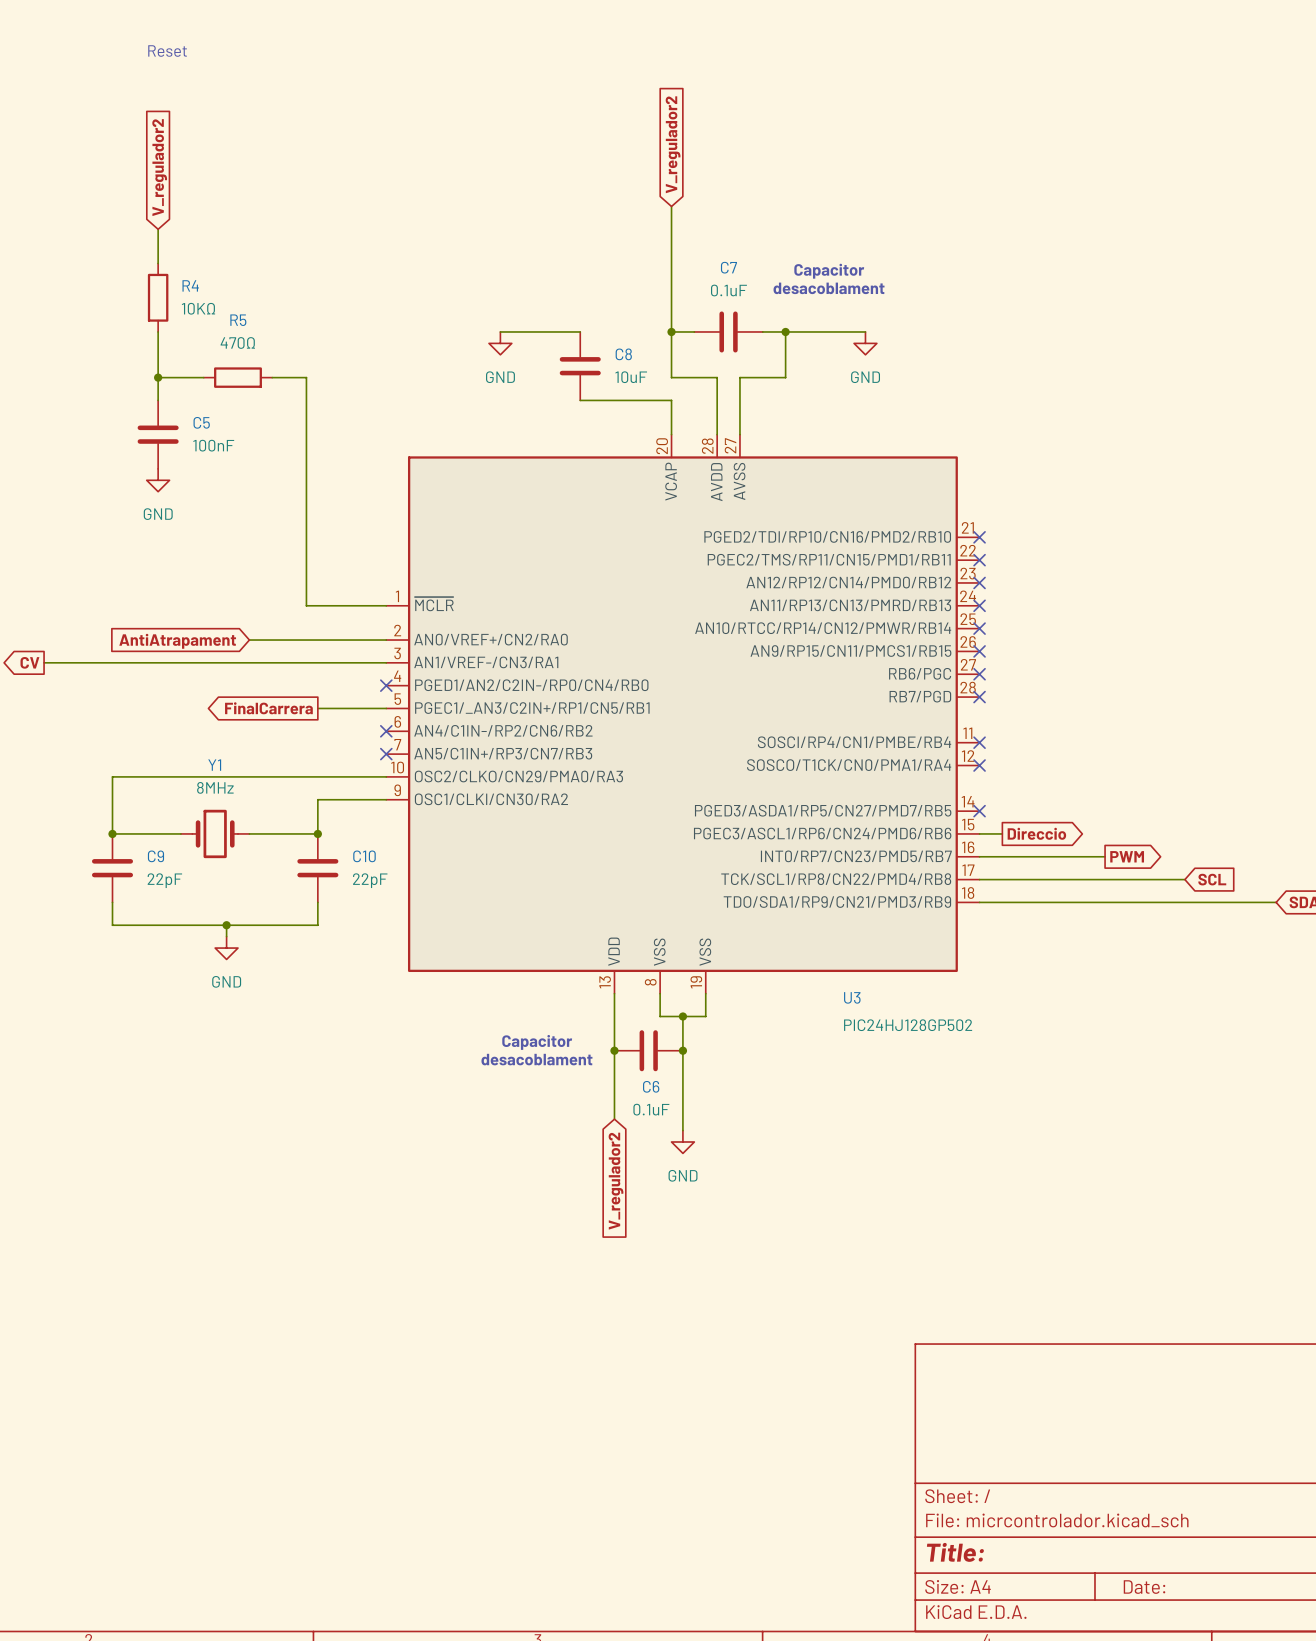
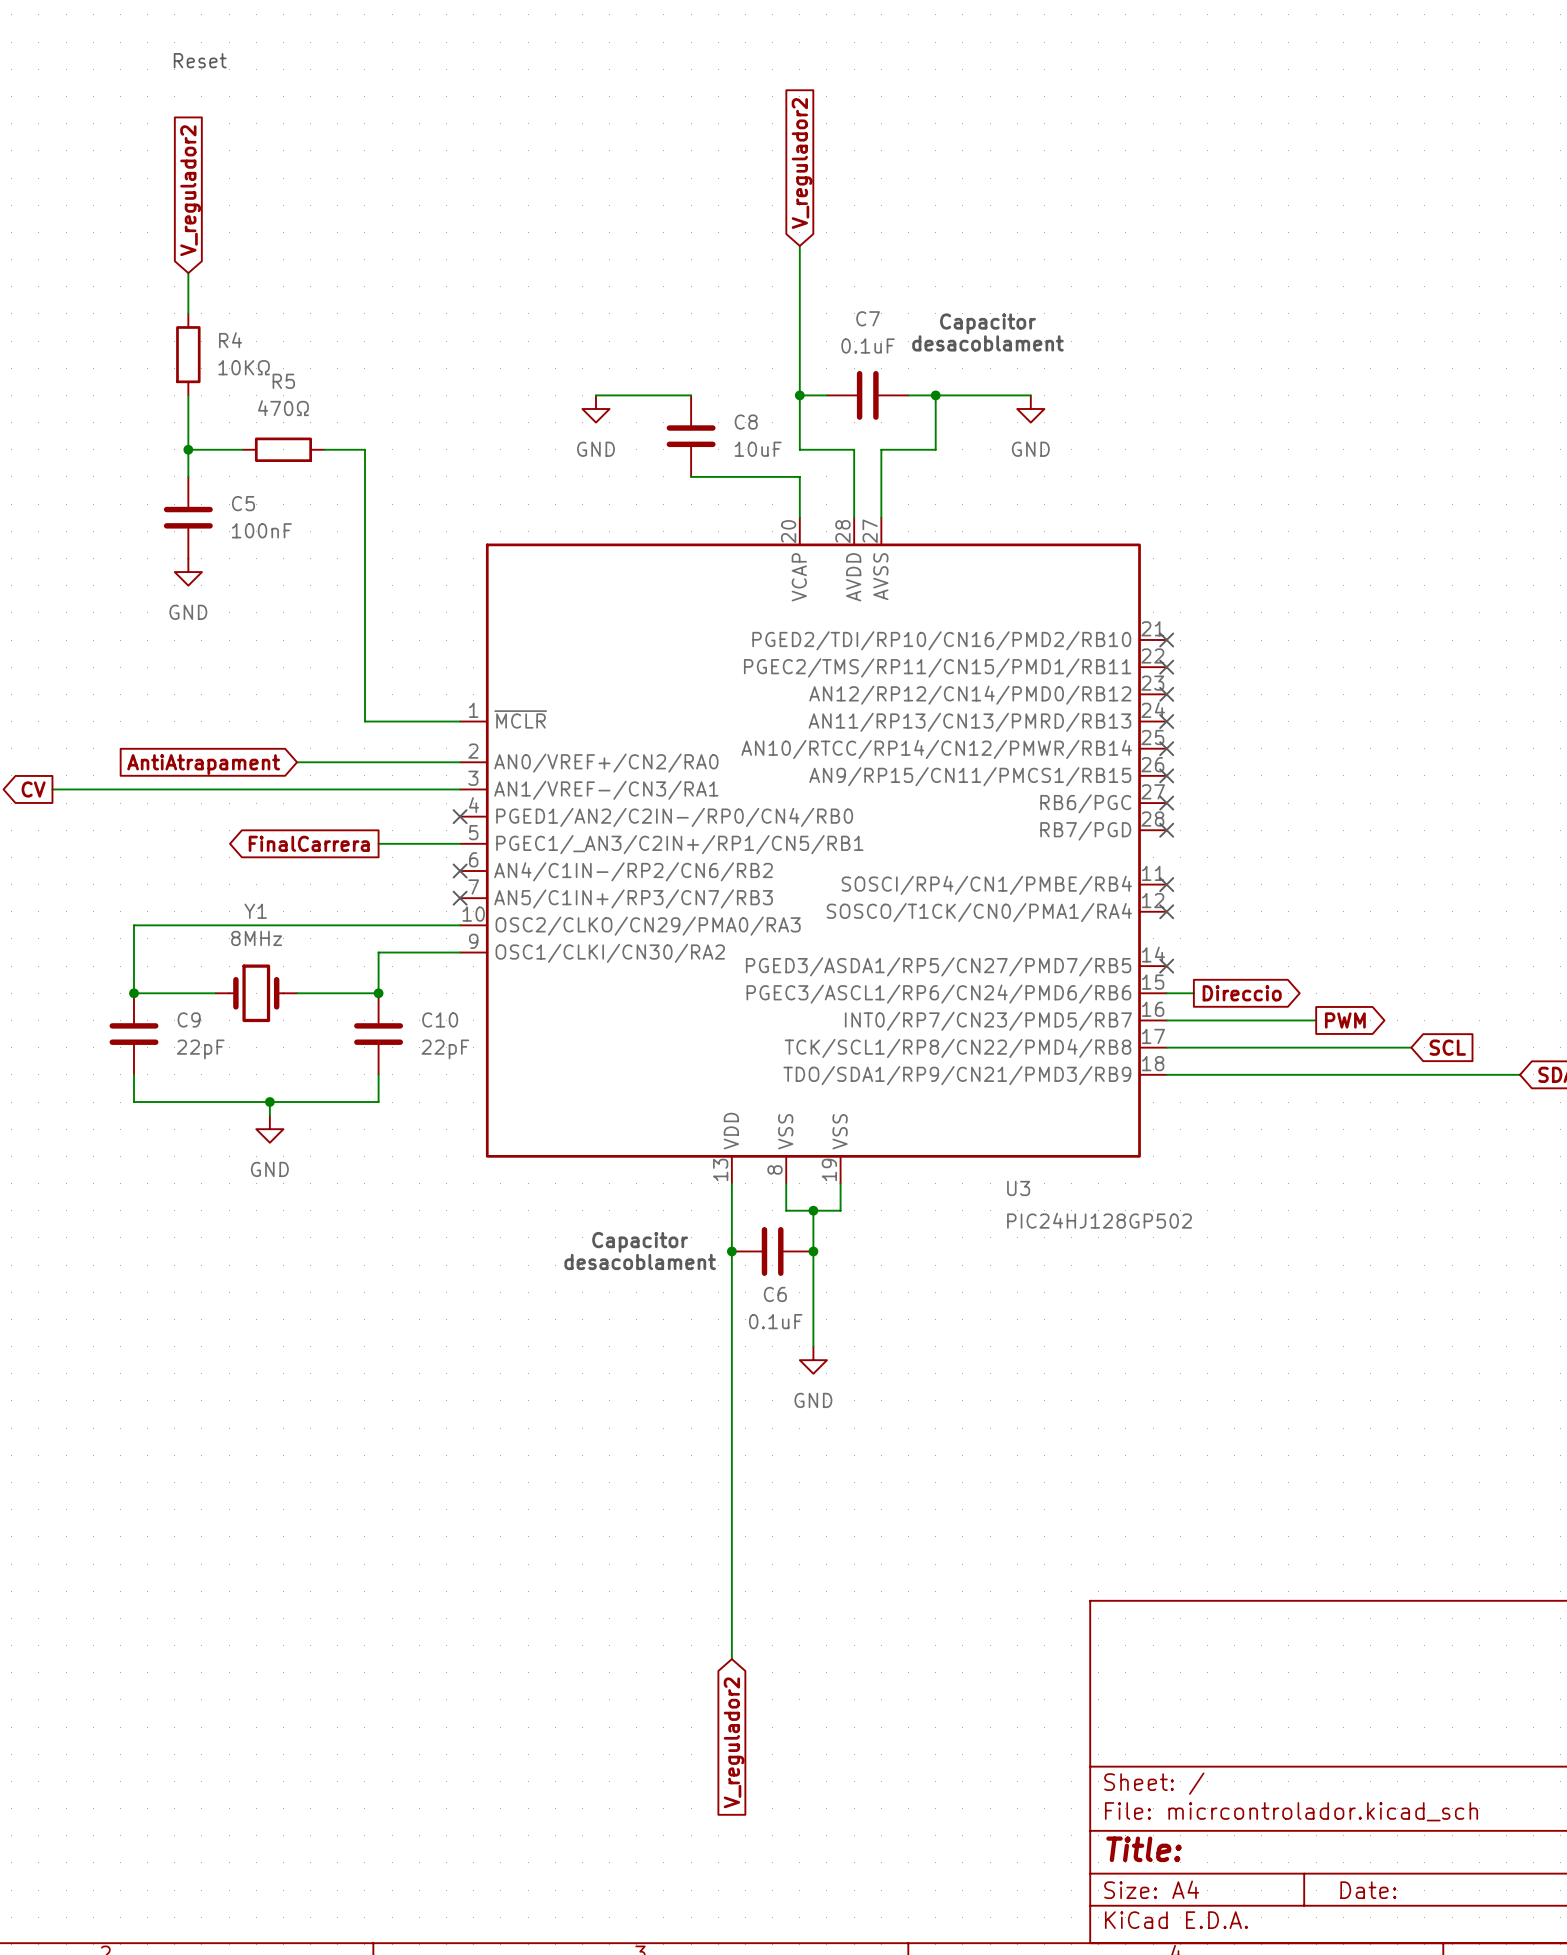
wire: none -> (731, 1333) (731, 1659)
global label: V_regulador2 (616, 1181) -> none
global label: none -> V_regulador2 (734, 1742)

